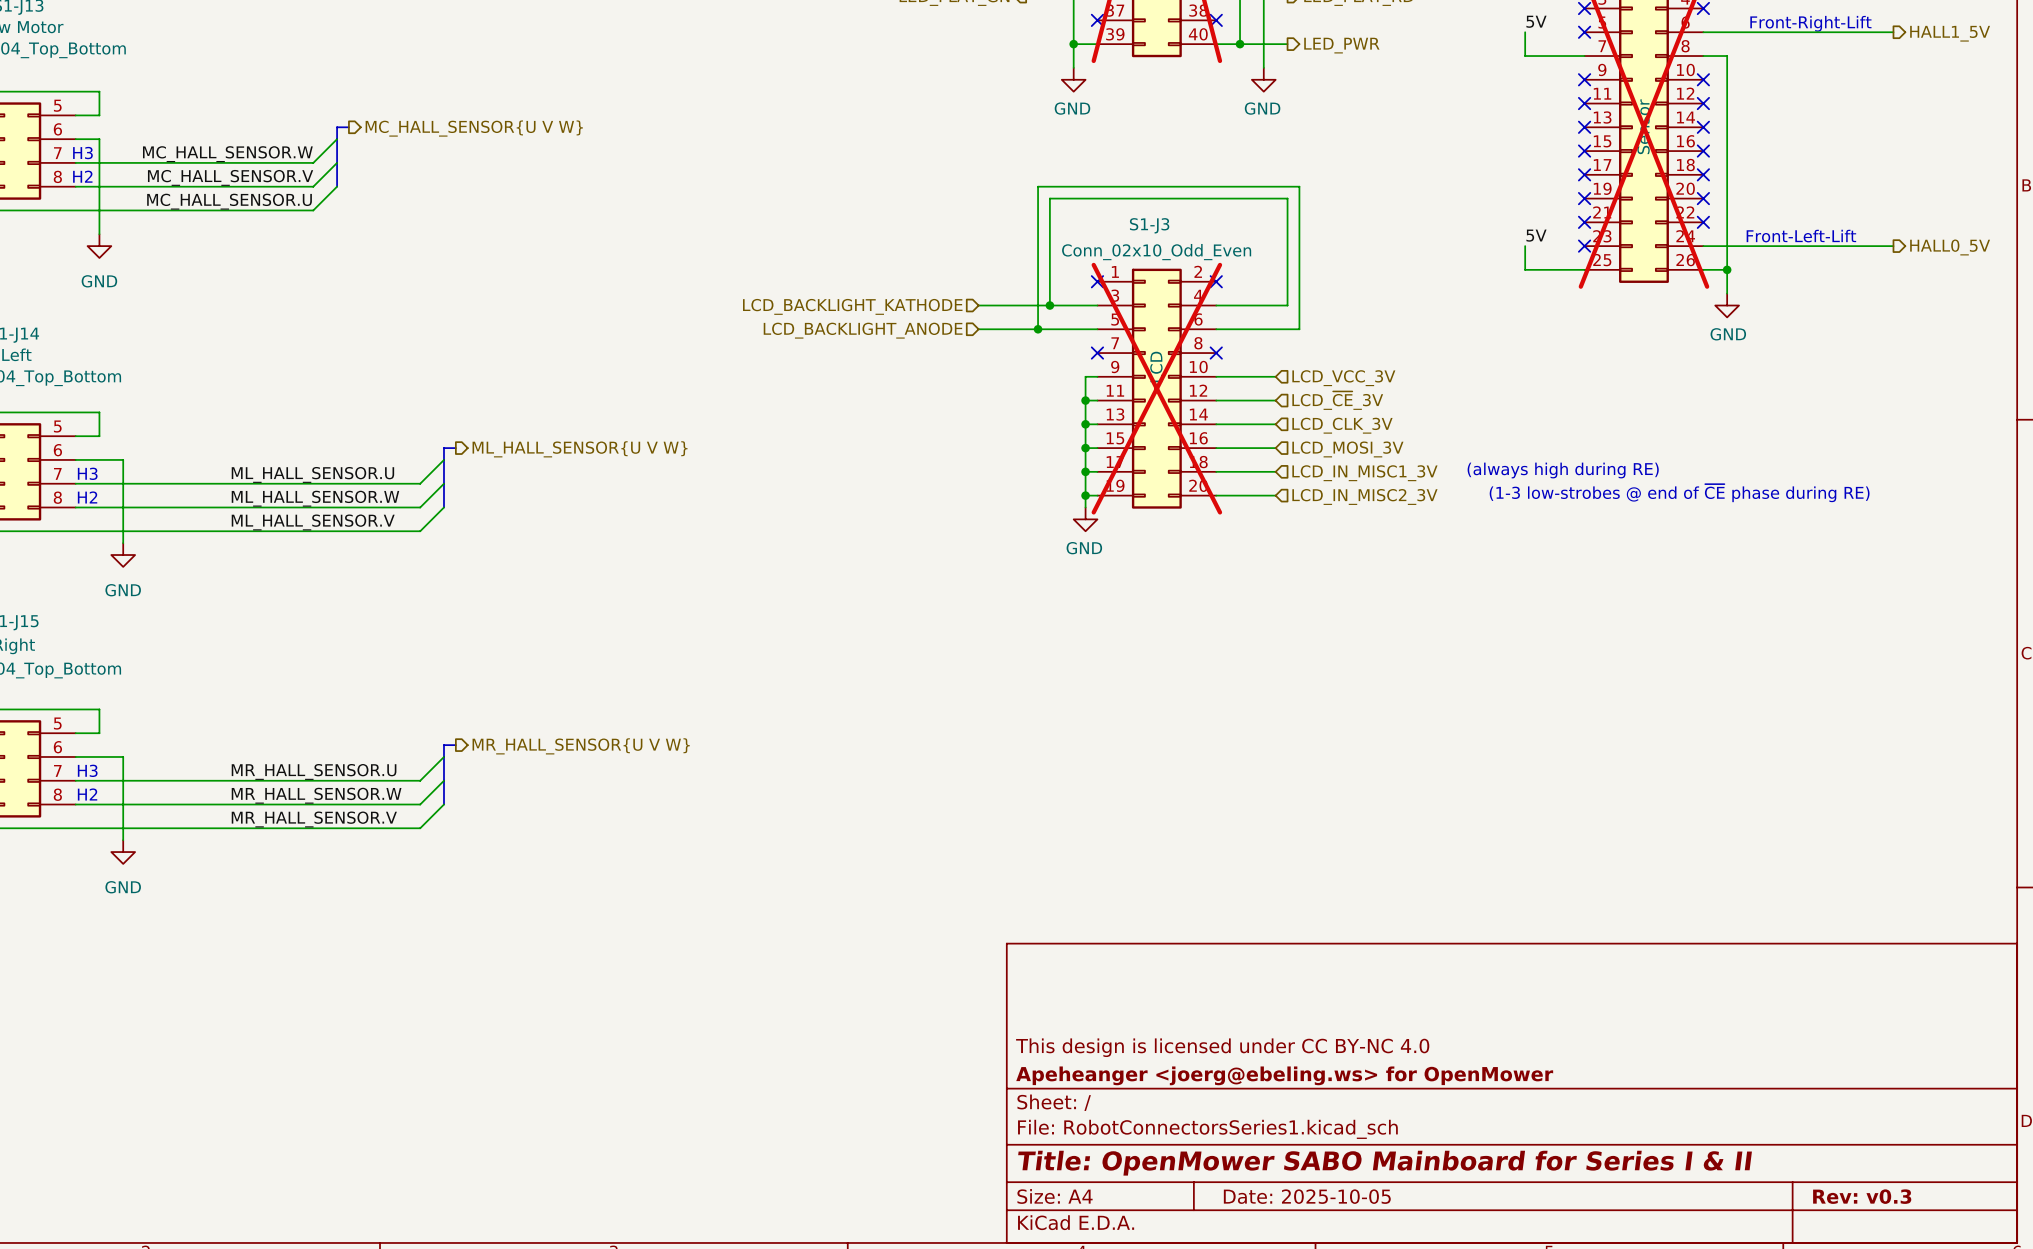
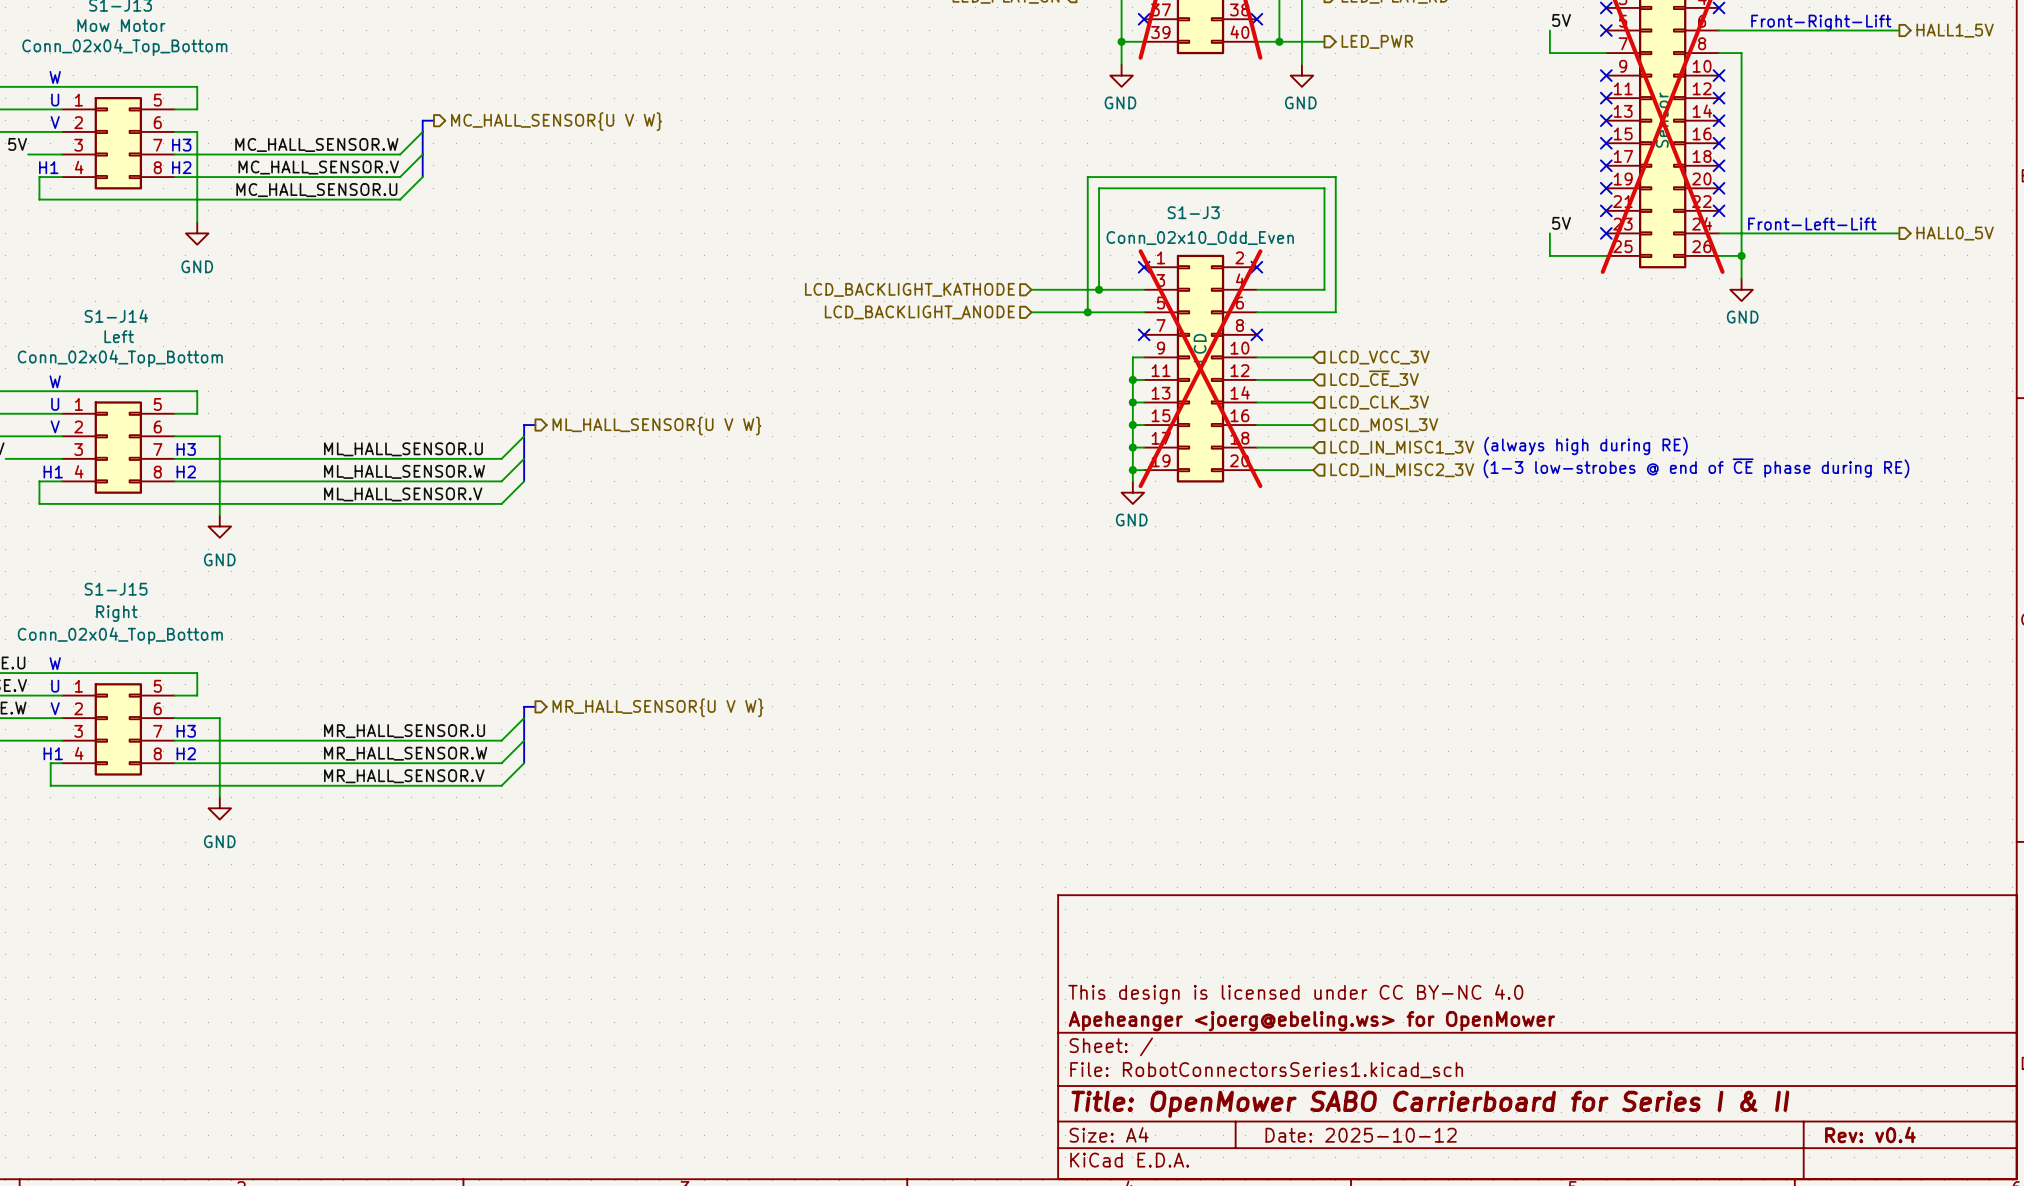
title block: Title: OpenMower SABO Mainboard for Series I & II (1385, 1163) -> Title: OpenMower SABO Carrierboard for Series I & II (1430, 1104)
title block: Date: 2025-10-05 (1307, 1196) -> Date: 2025-10-12 (1361, 1135)
title block: Rev: v0.3 (1862, 1196) -> Rev: v0.4 (1870, 1134)

